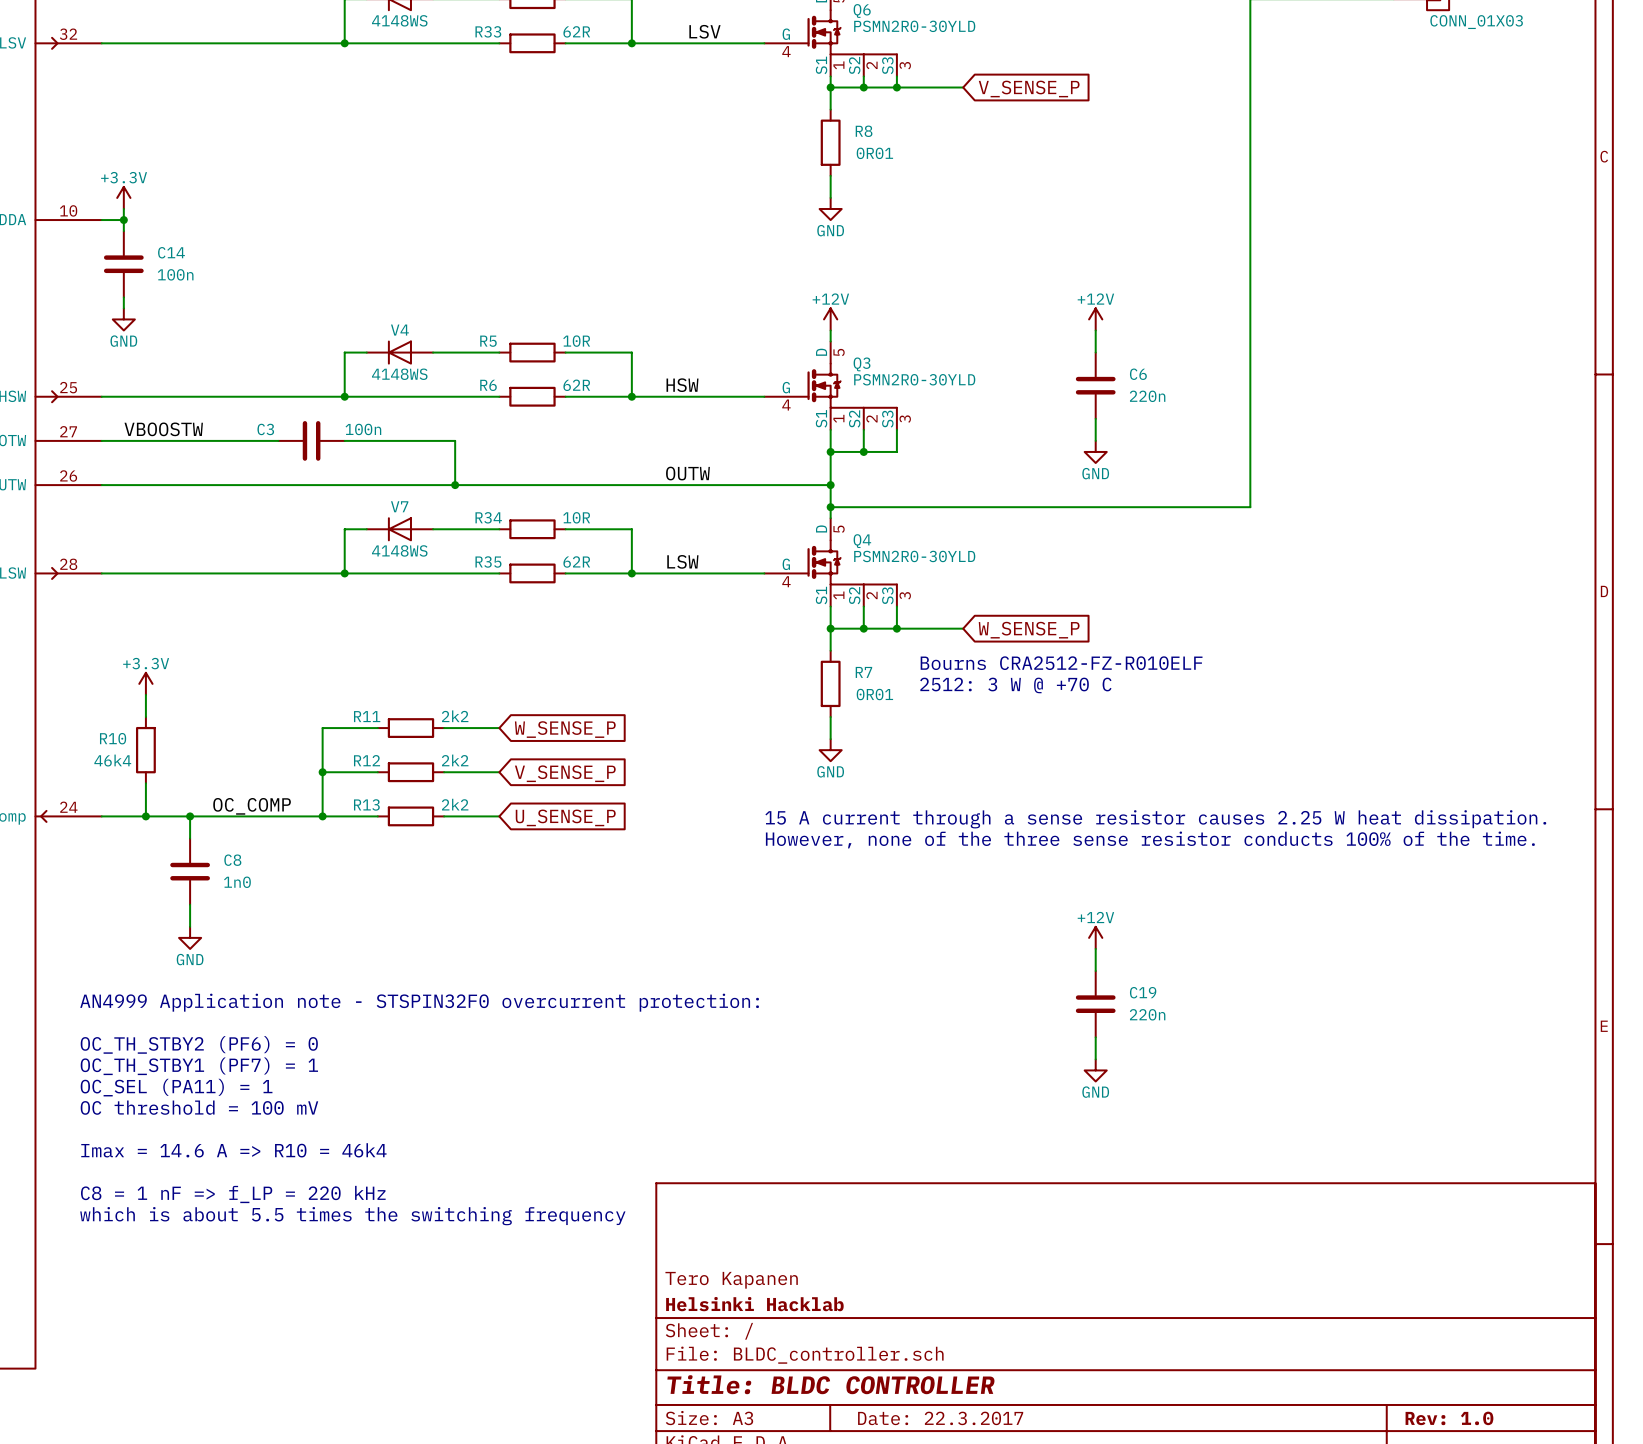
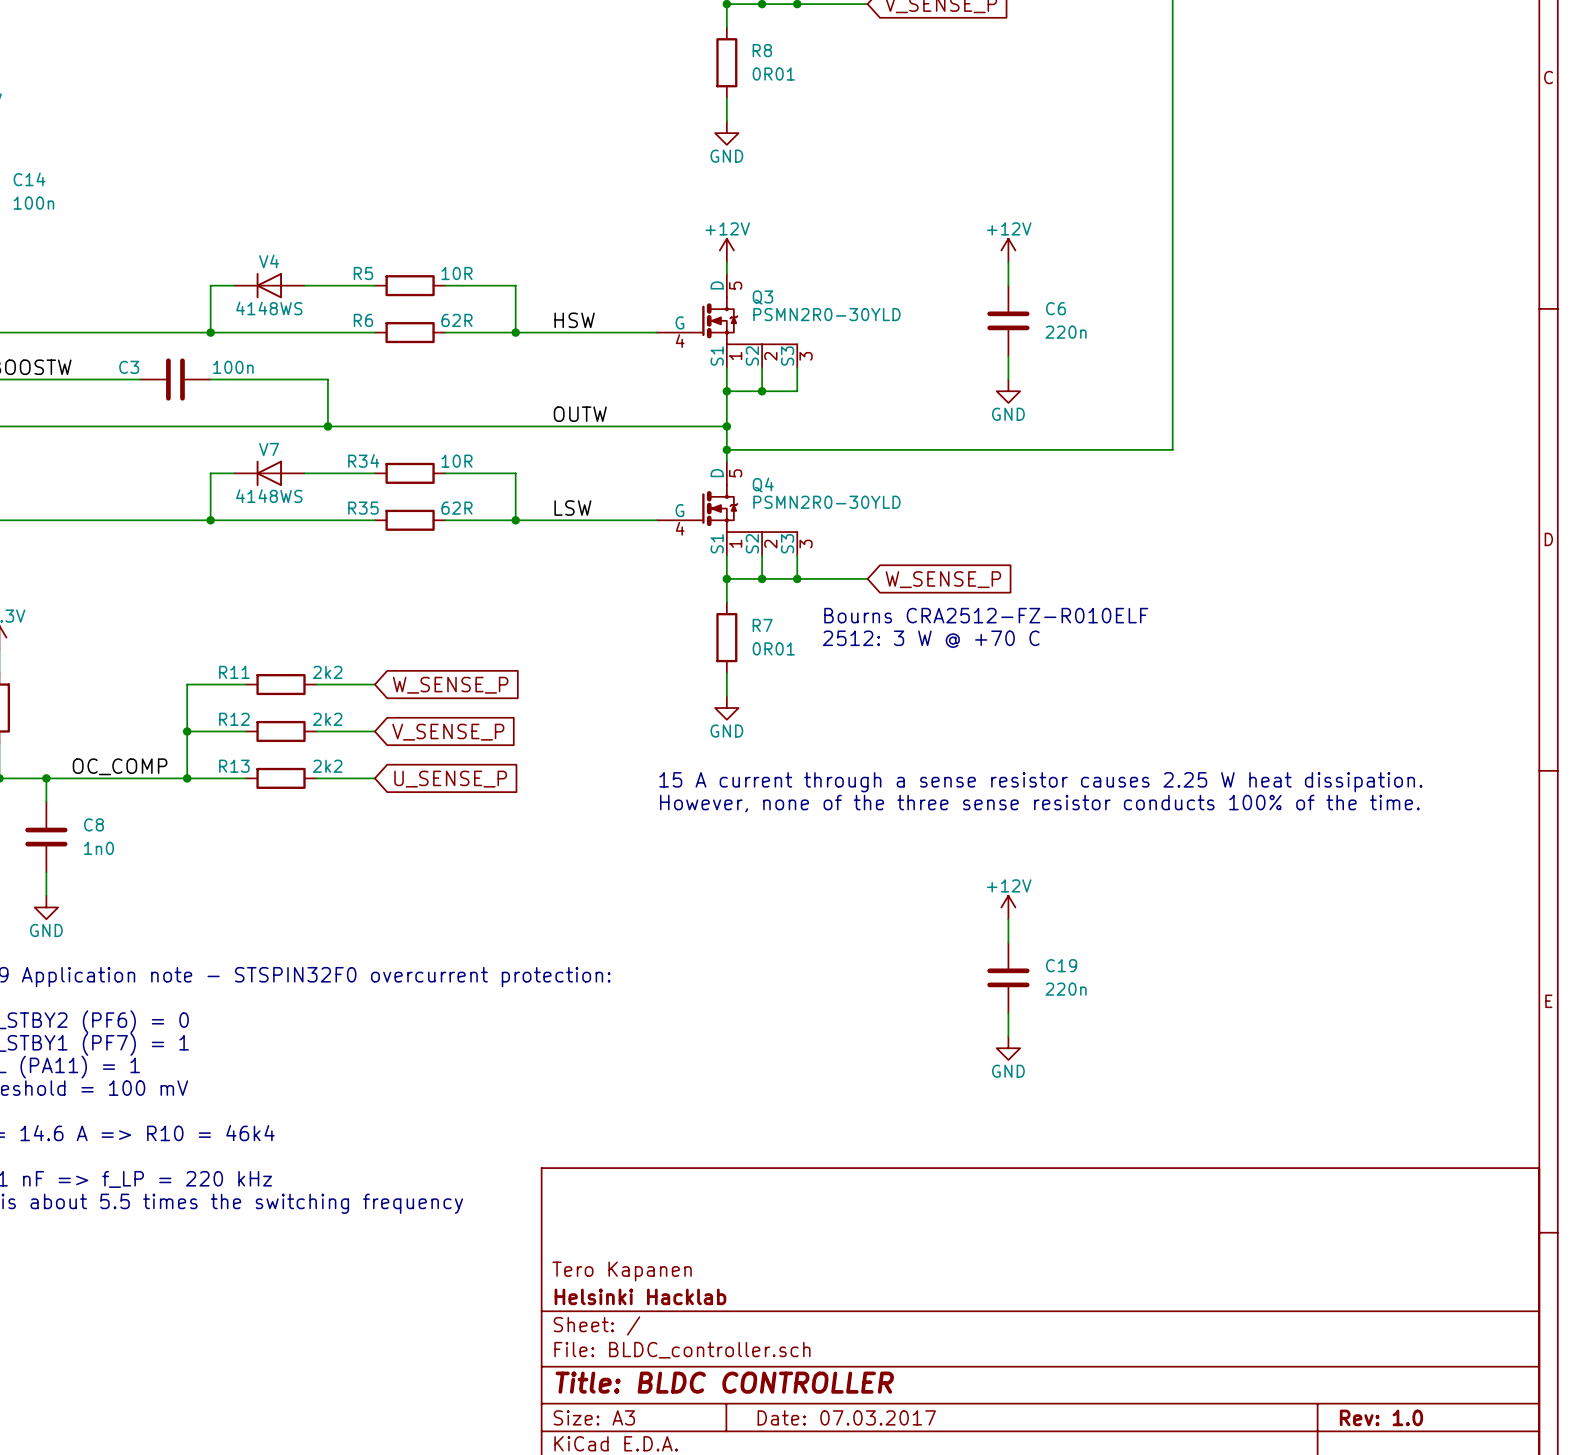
title block: Date: 22.3.2017 (940, 1418) -> Date: 07.03.2017 (846, 1417)

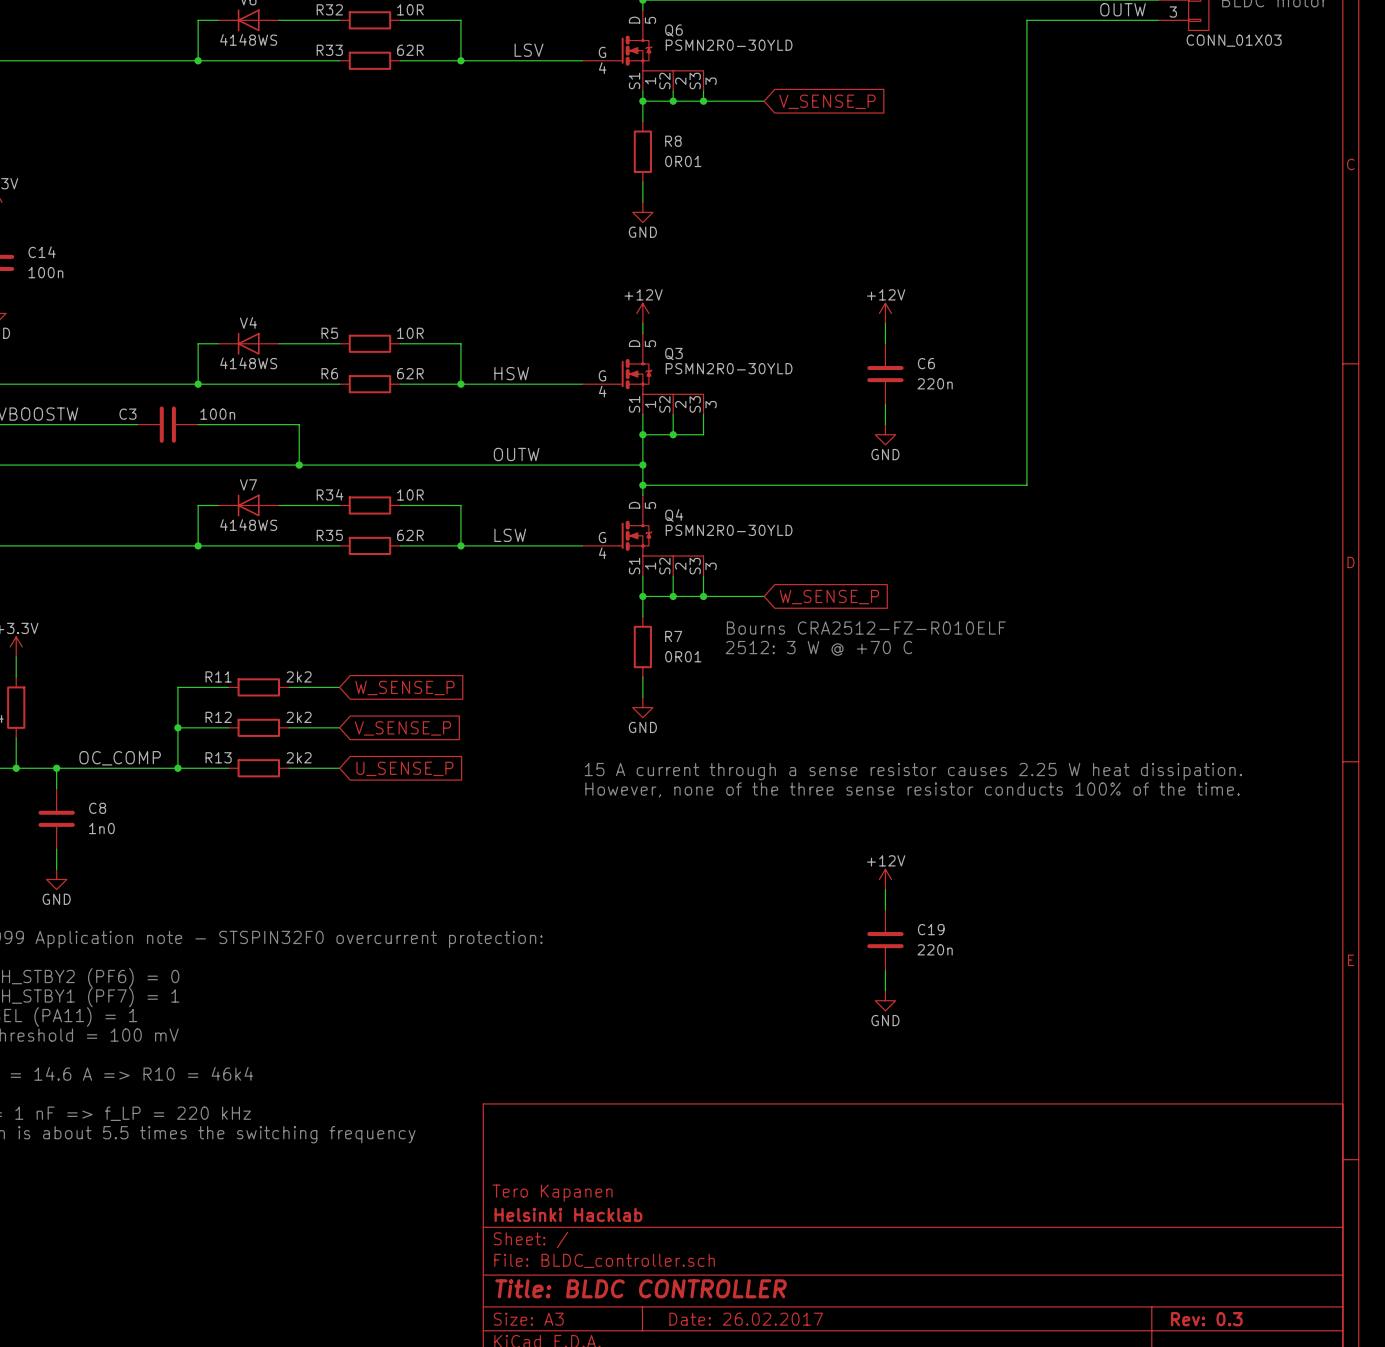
title block: Date: 07.03.2017 (846, 1417) -> Date: 26.02.2017 (746, 1319)
title block: Rev: 1.0 (1381, 1417) -> Rev: 0.3 (1206, 1319)

